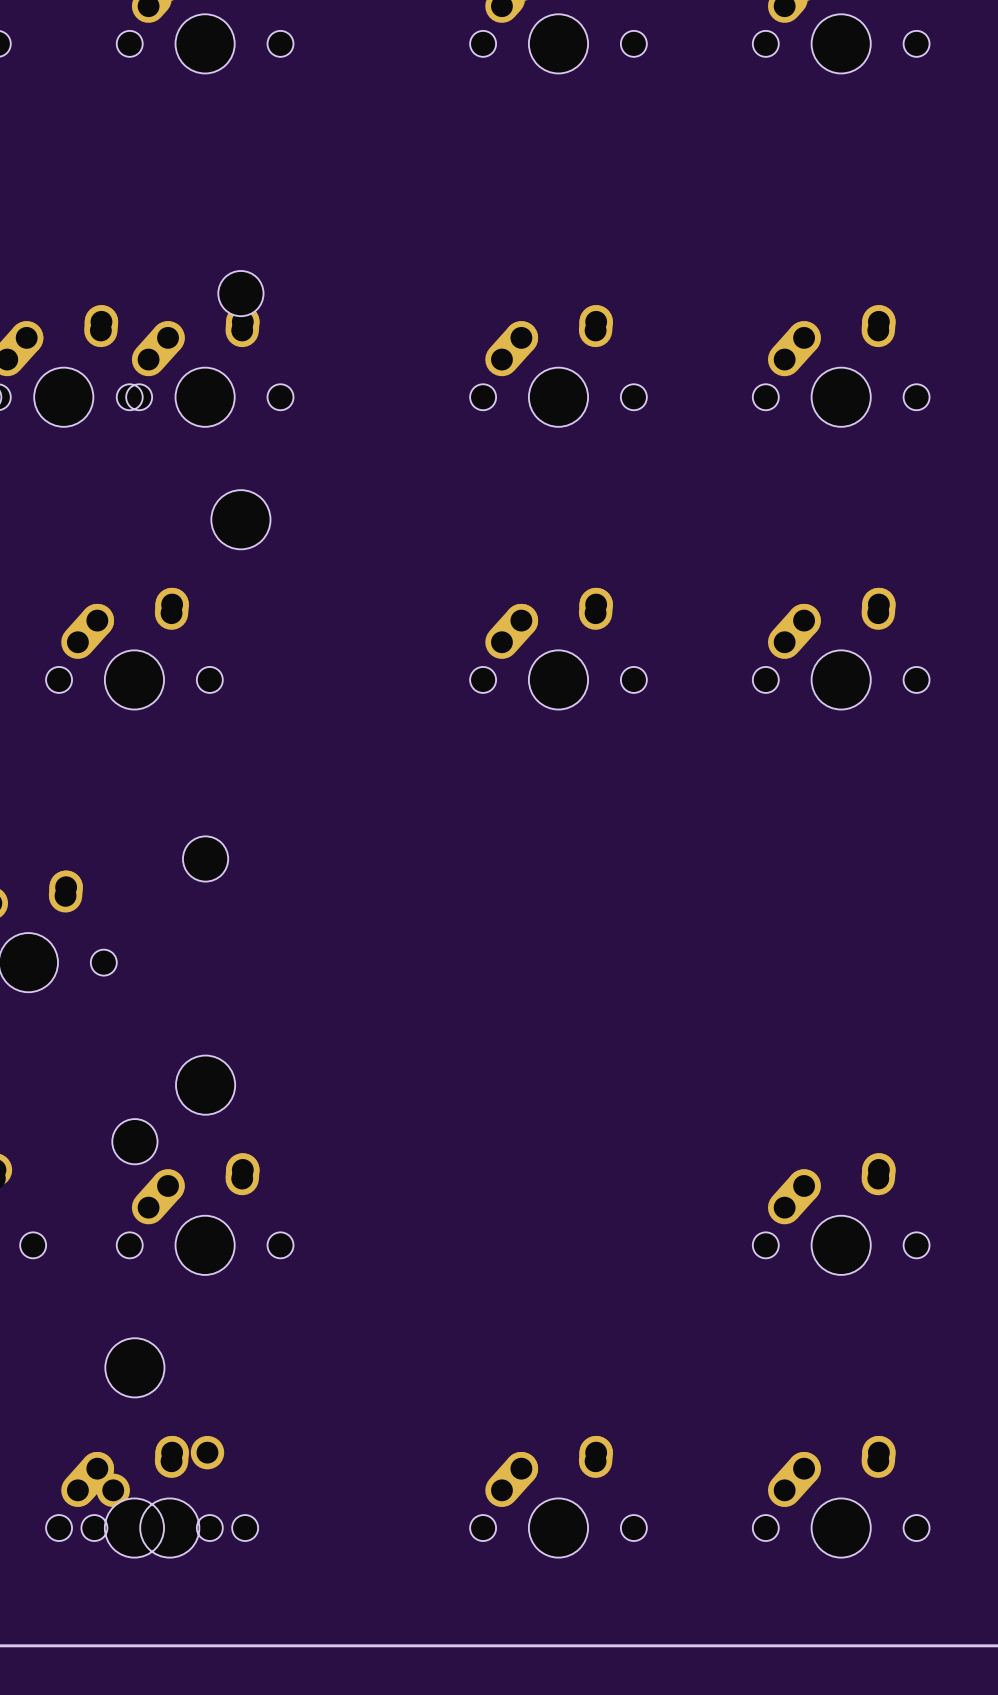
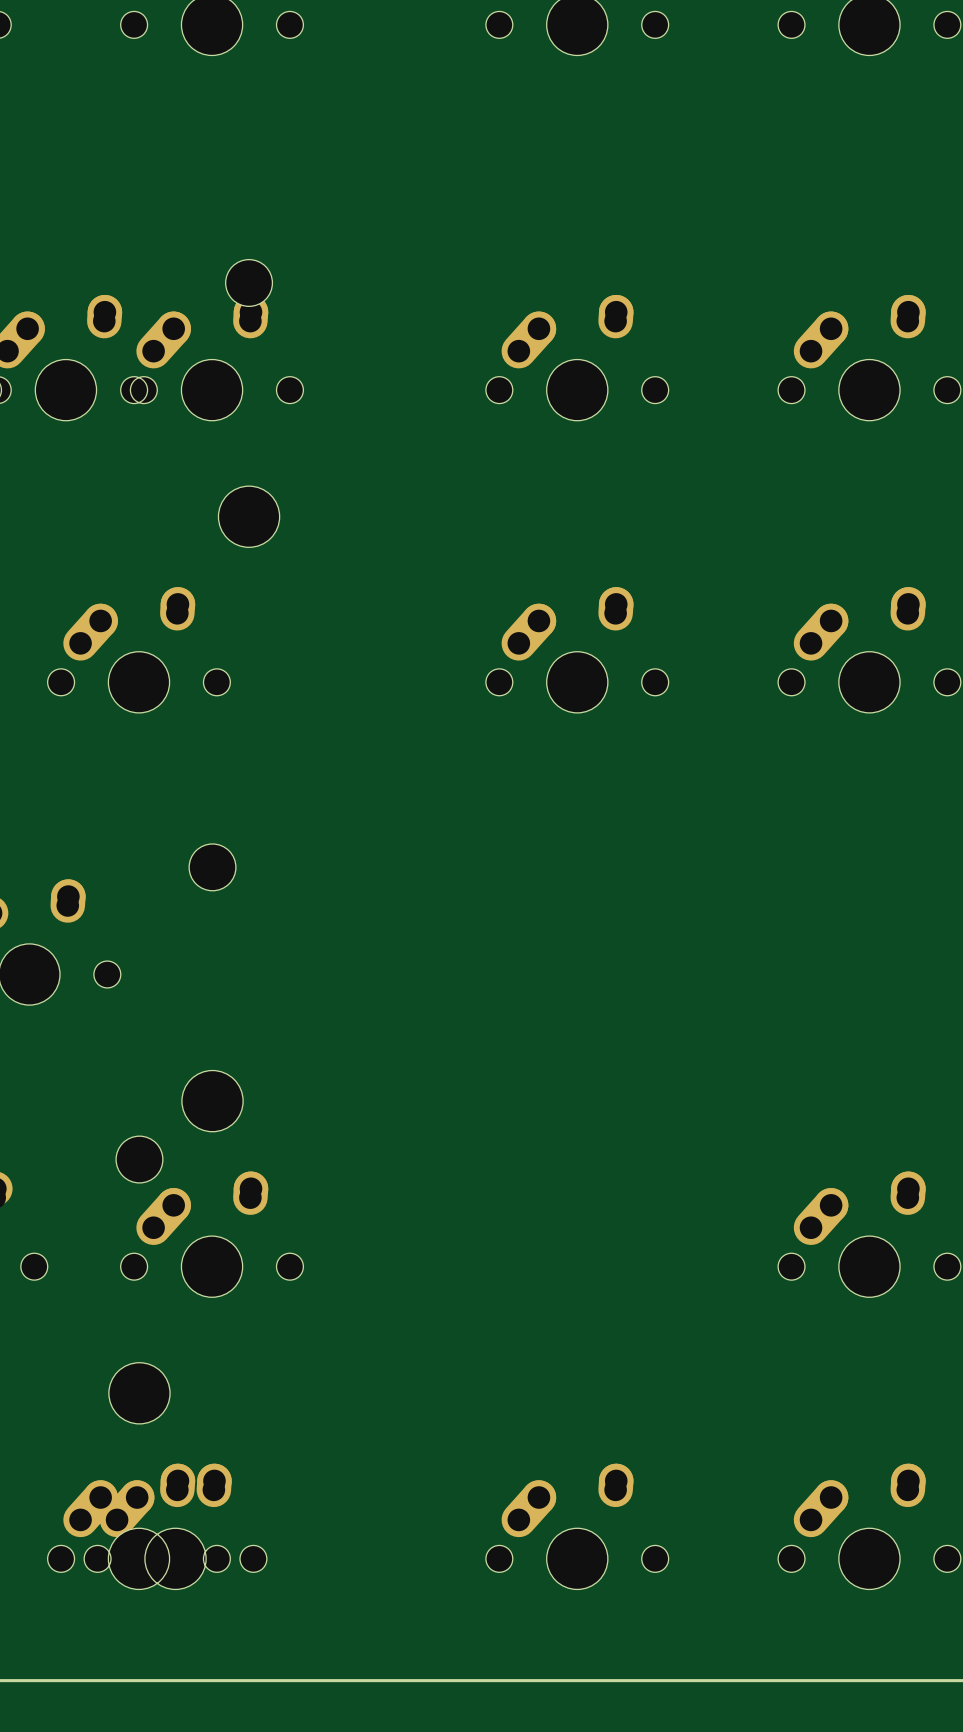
part footprint: [81, 1435, 259, 1558] -> [84, 1463, 267, 1590]

